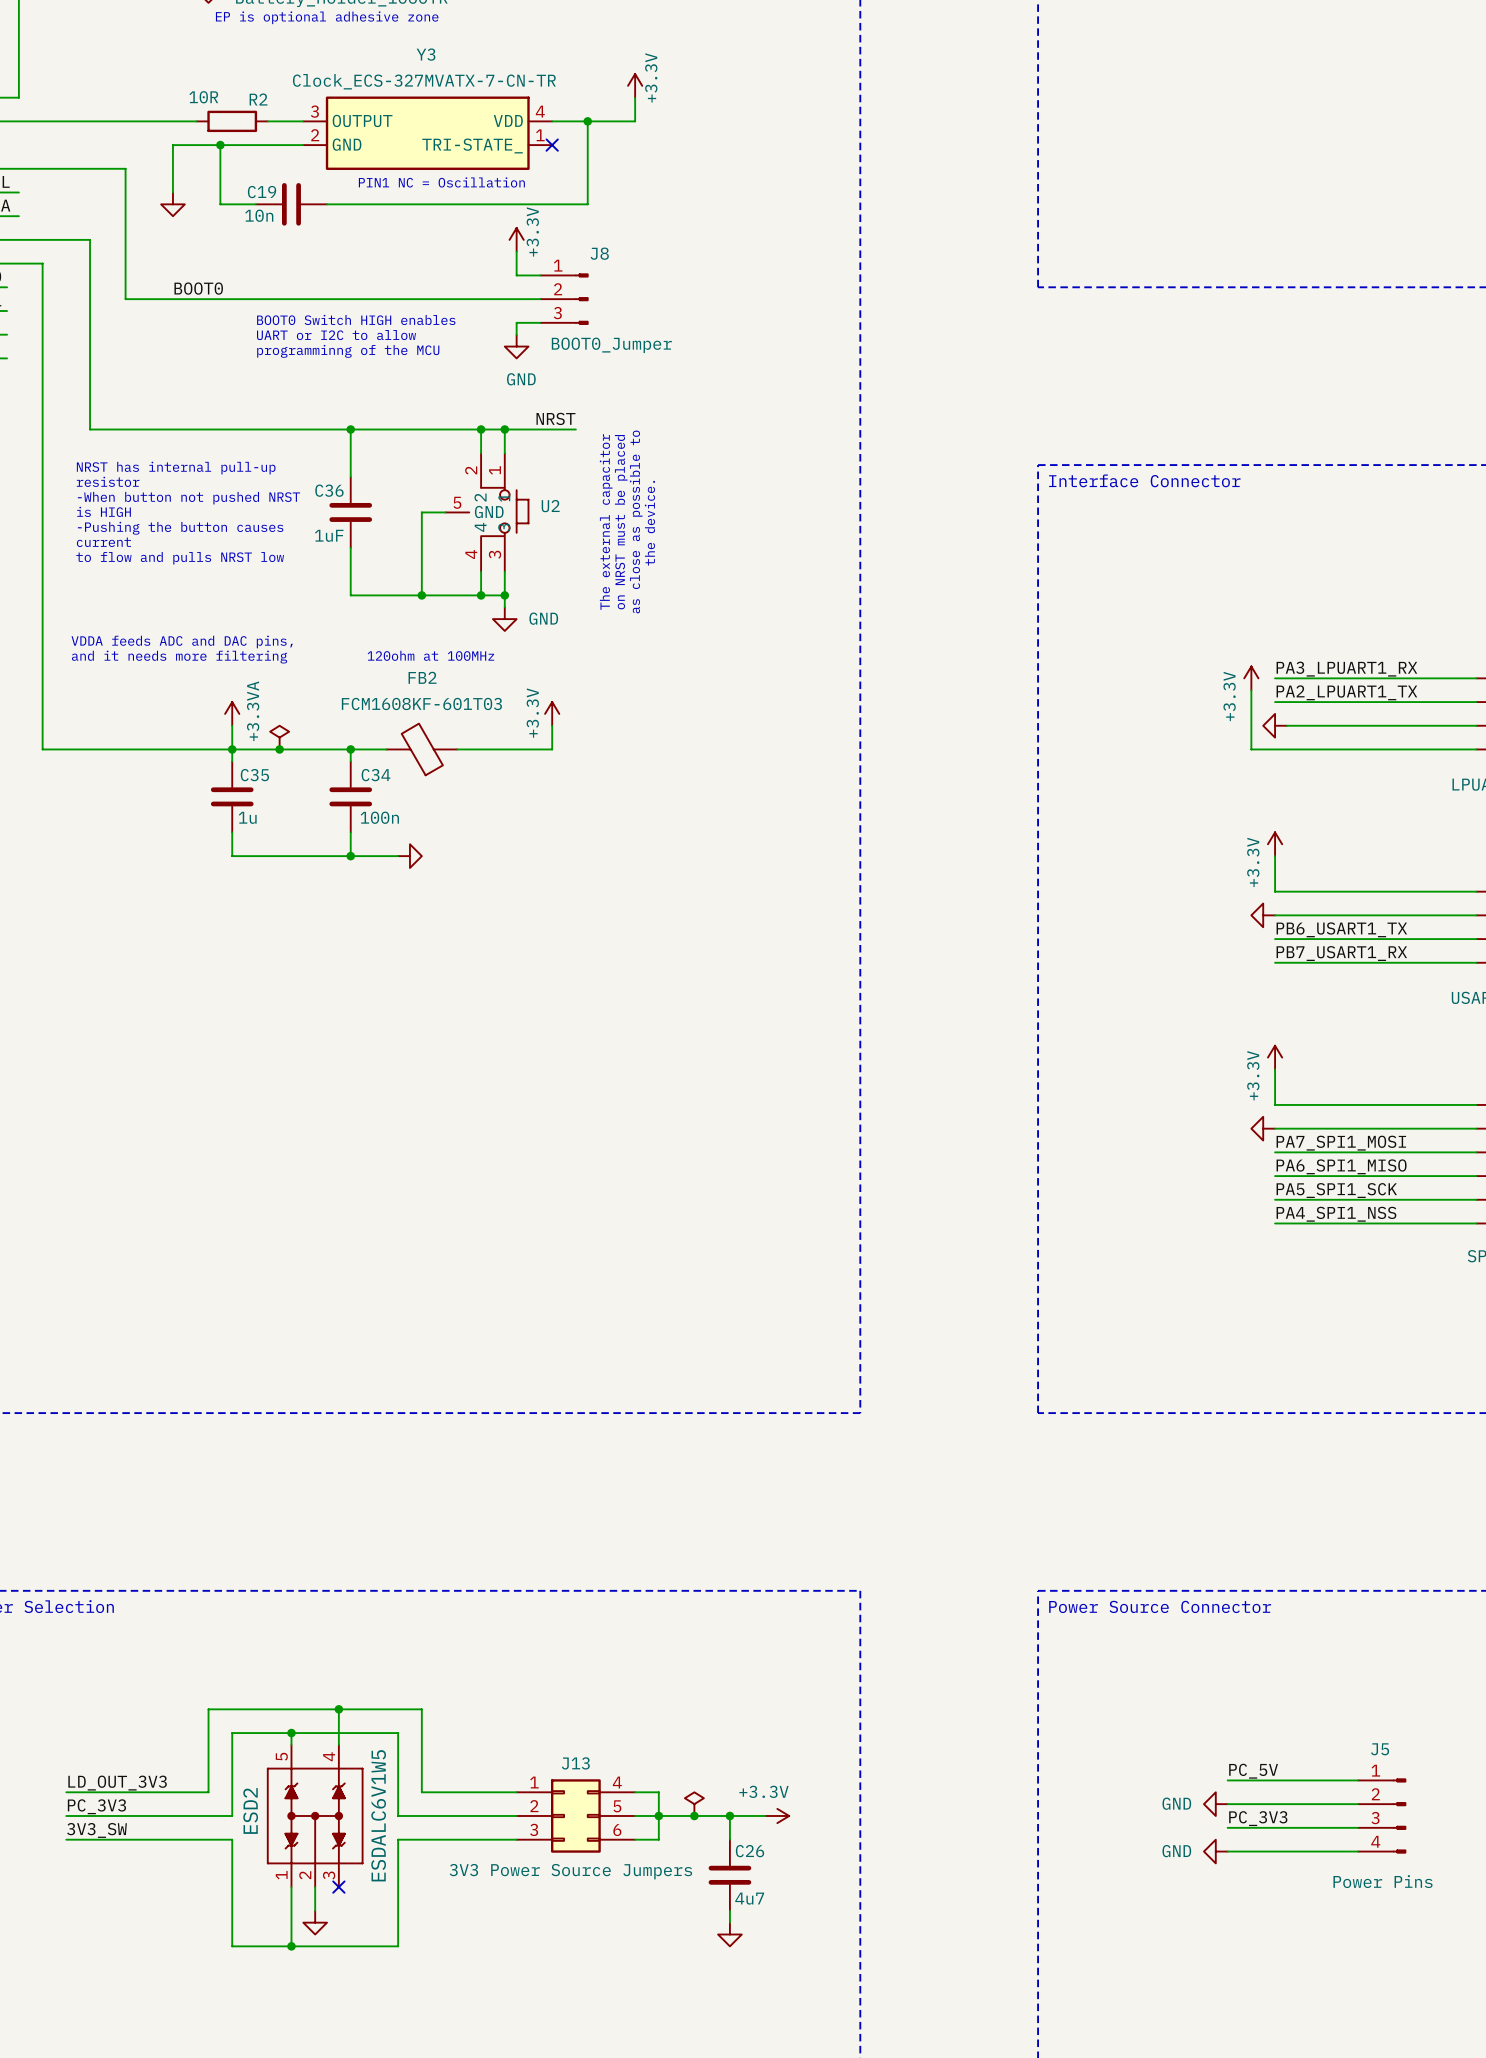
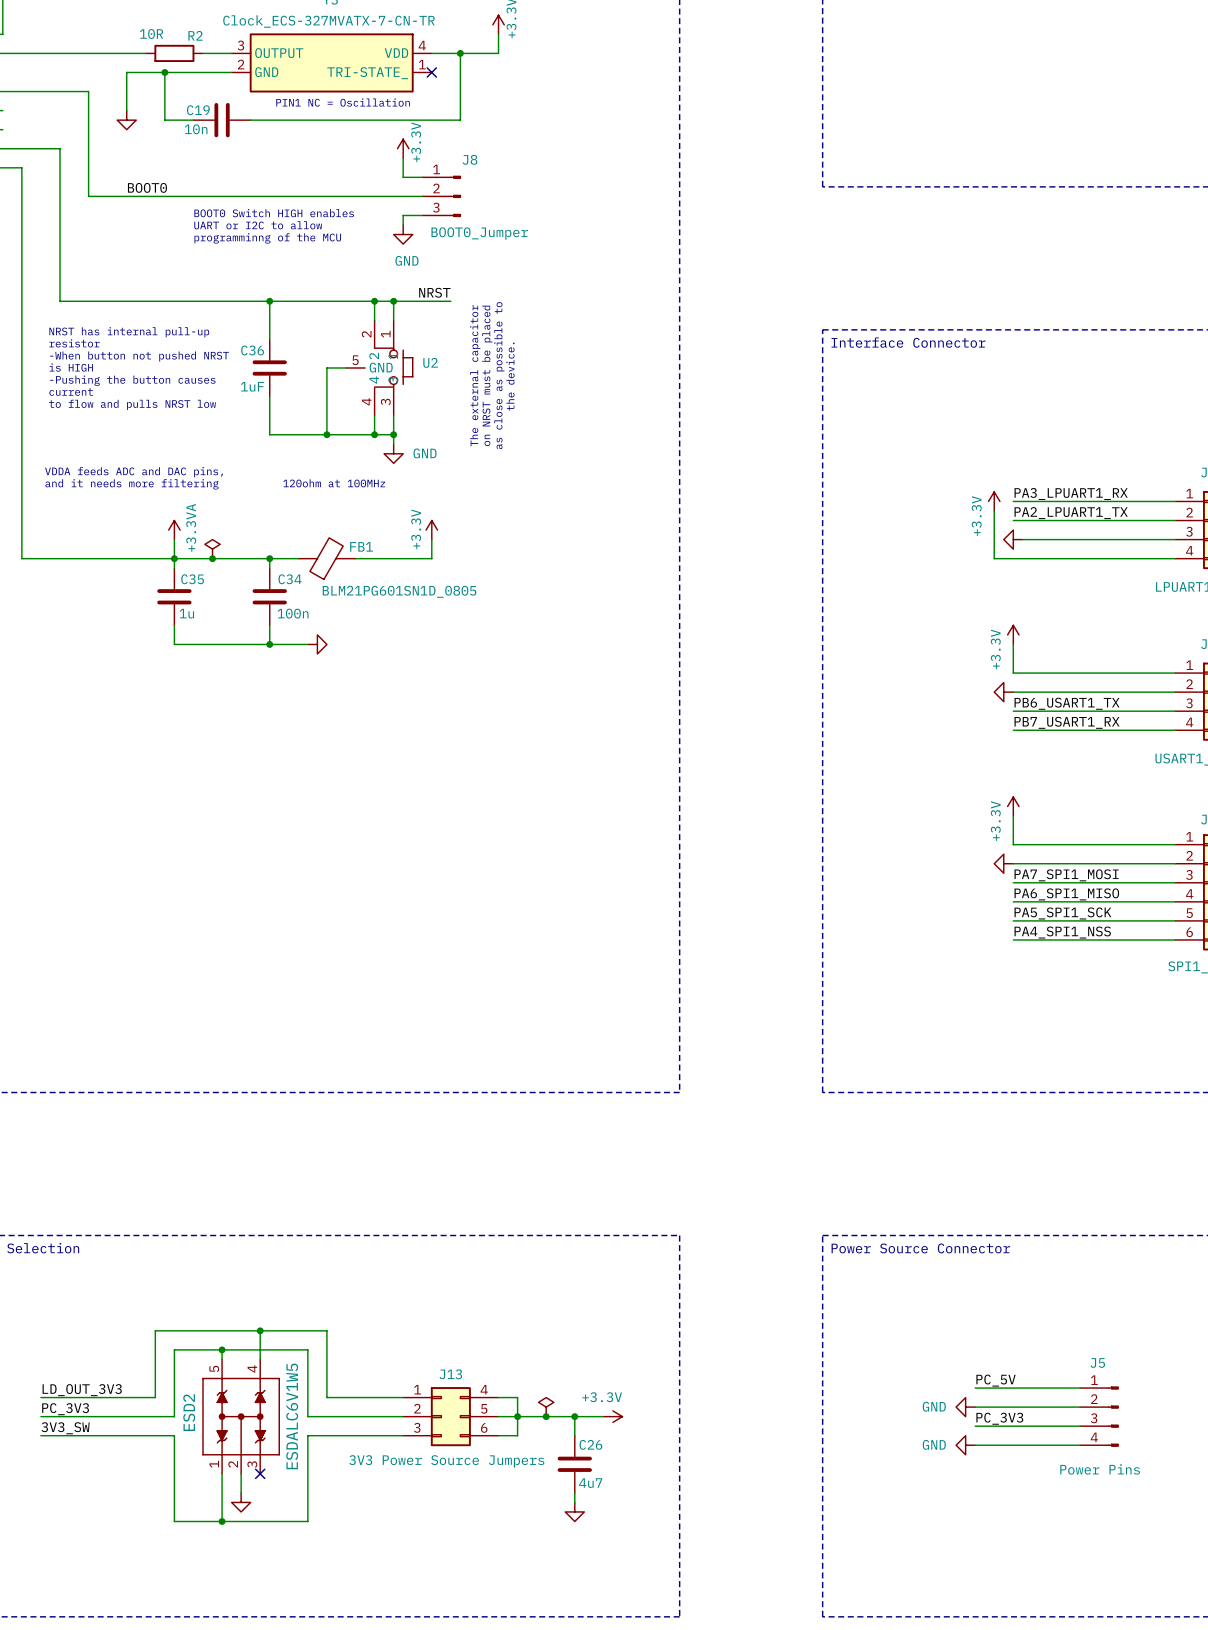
FB2: FCM1608KF-601T03 (421, 749) -> none
FB1: none -> BLM21PG601SN1D_0805 (326, 558)

